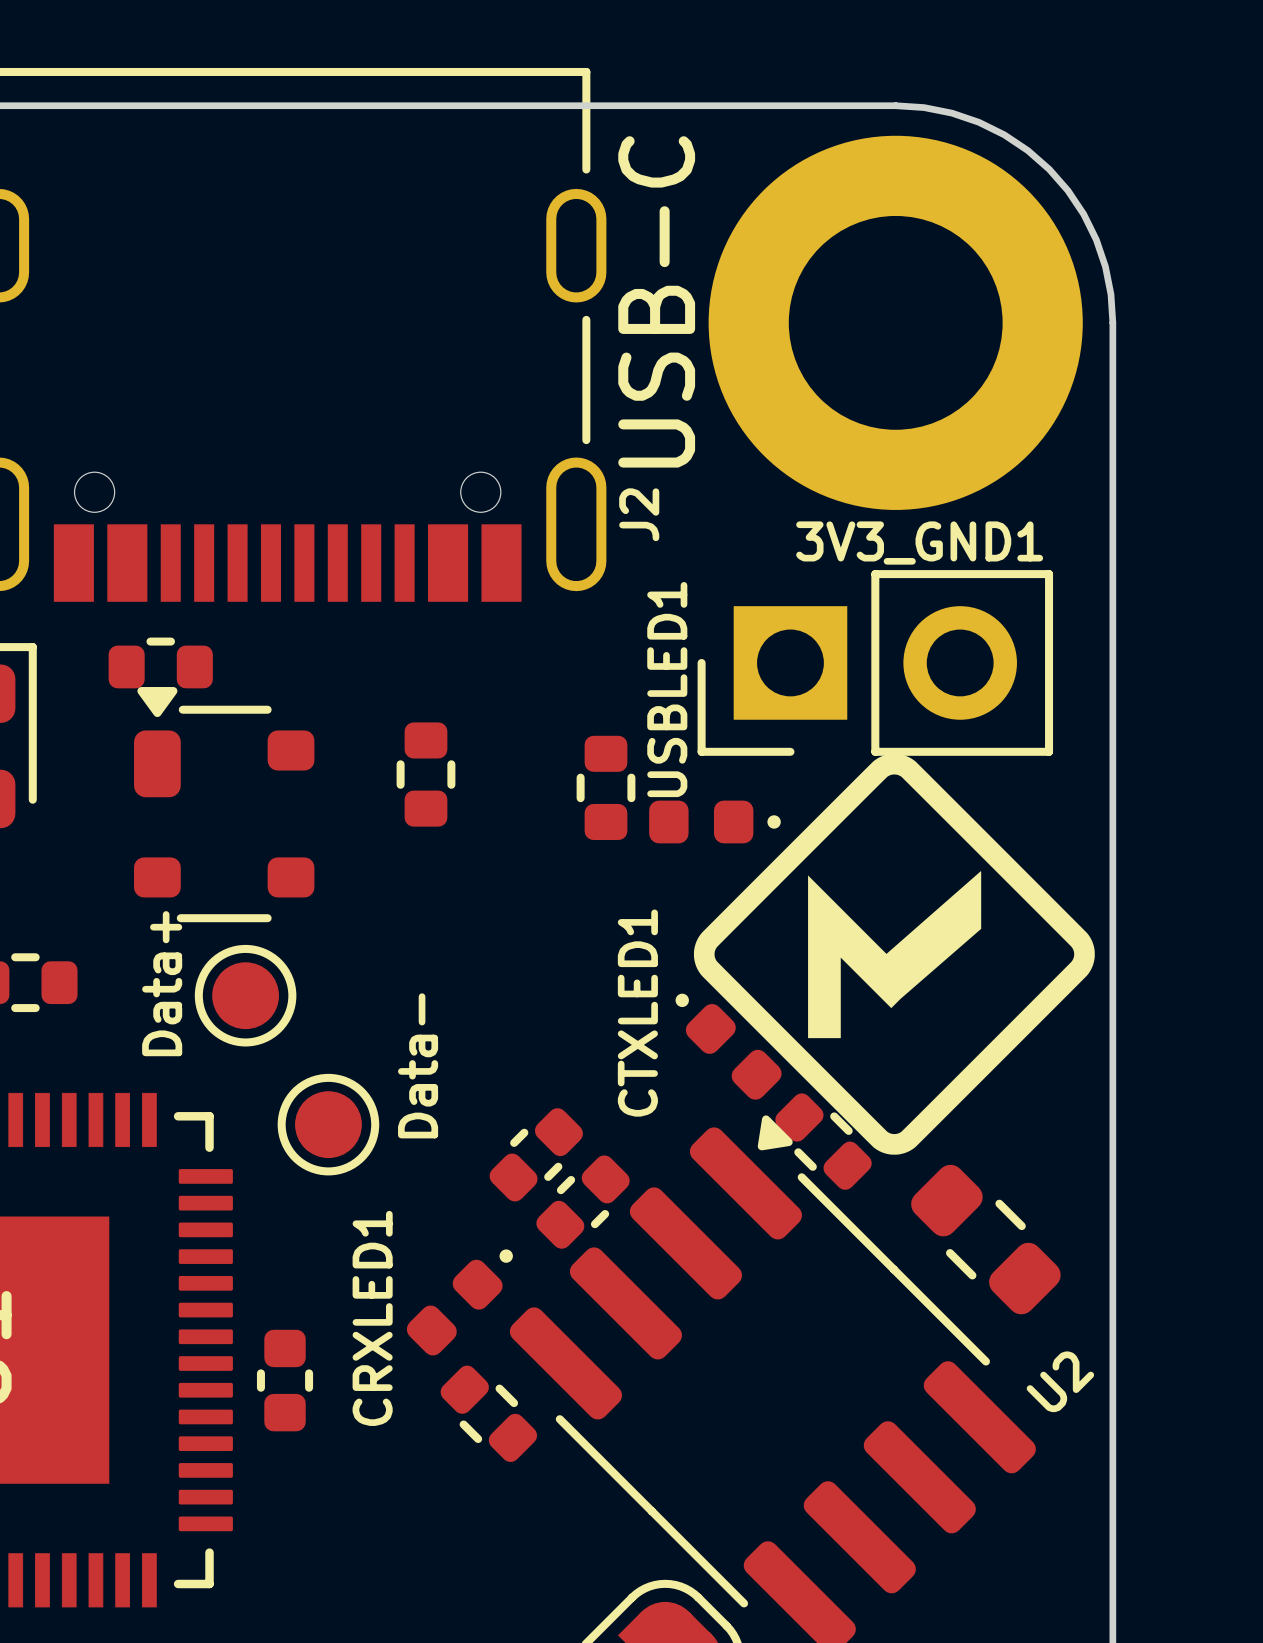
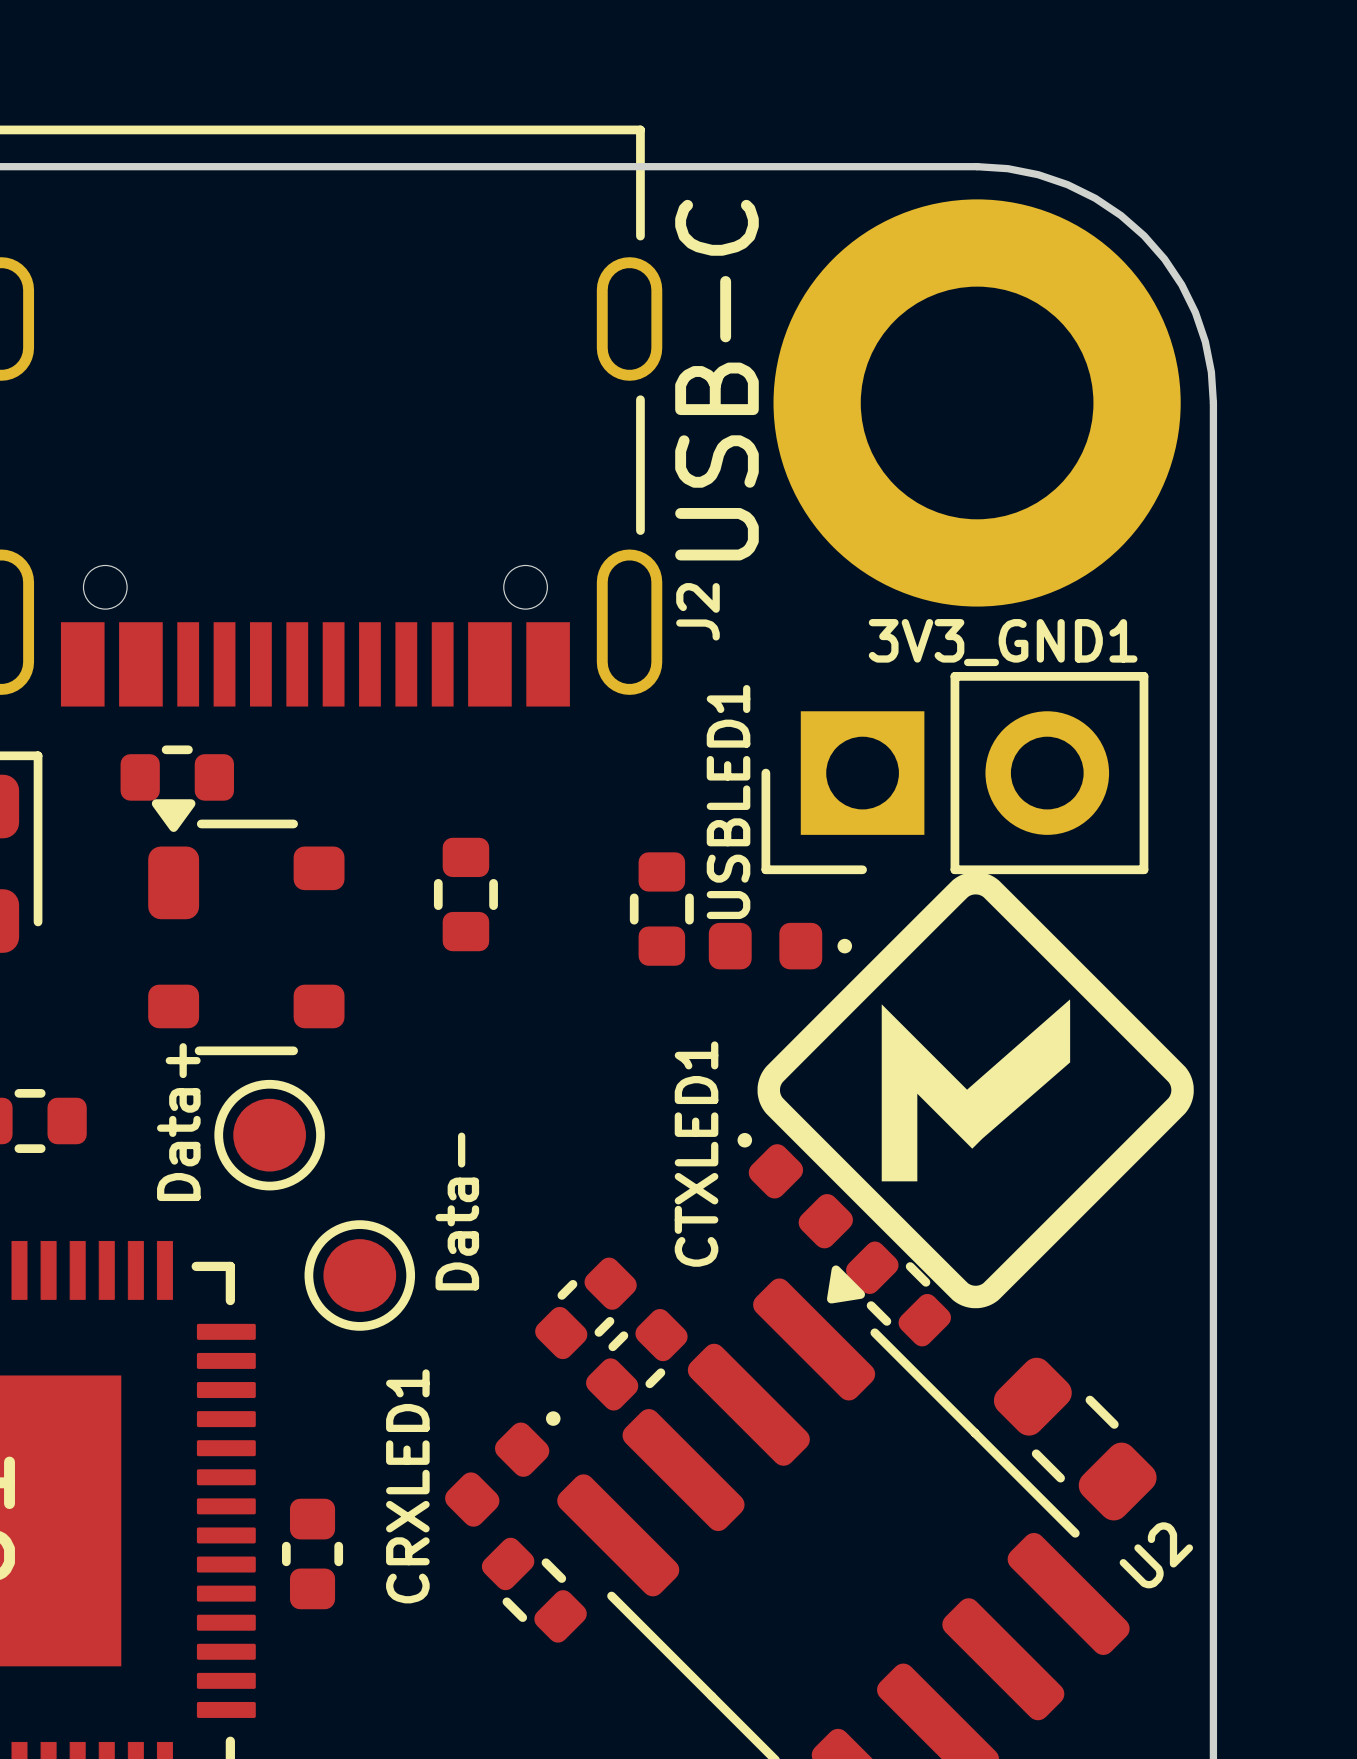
part position: (985, 1239) -> (1075, 1439)

